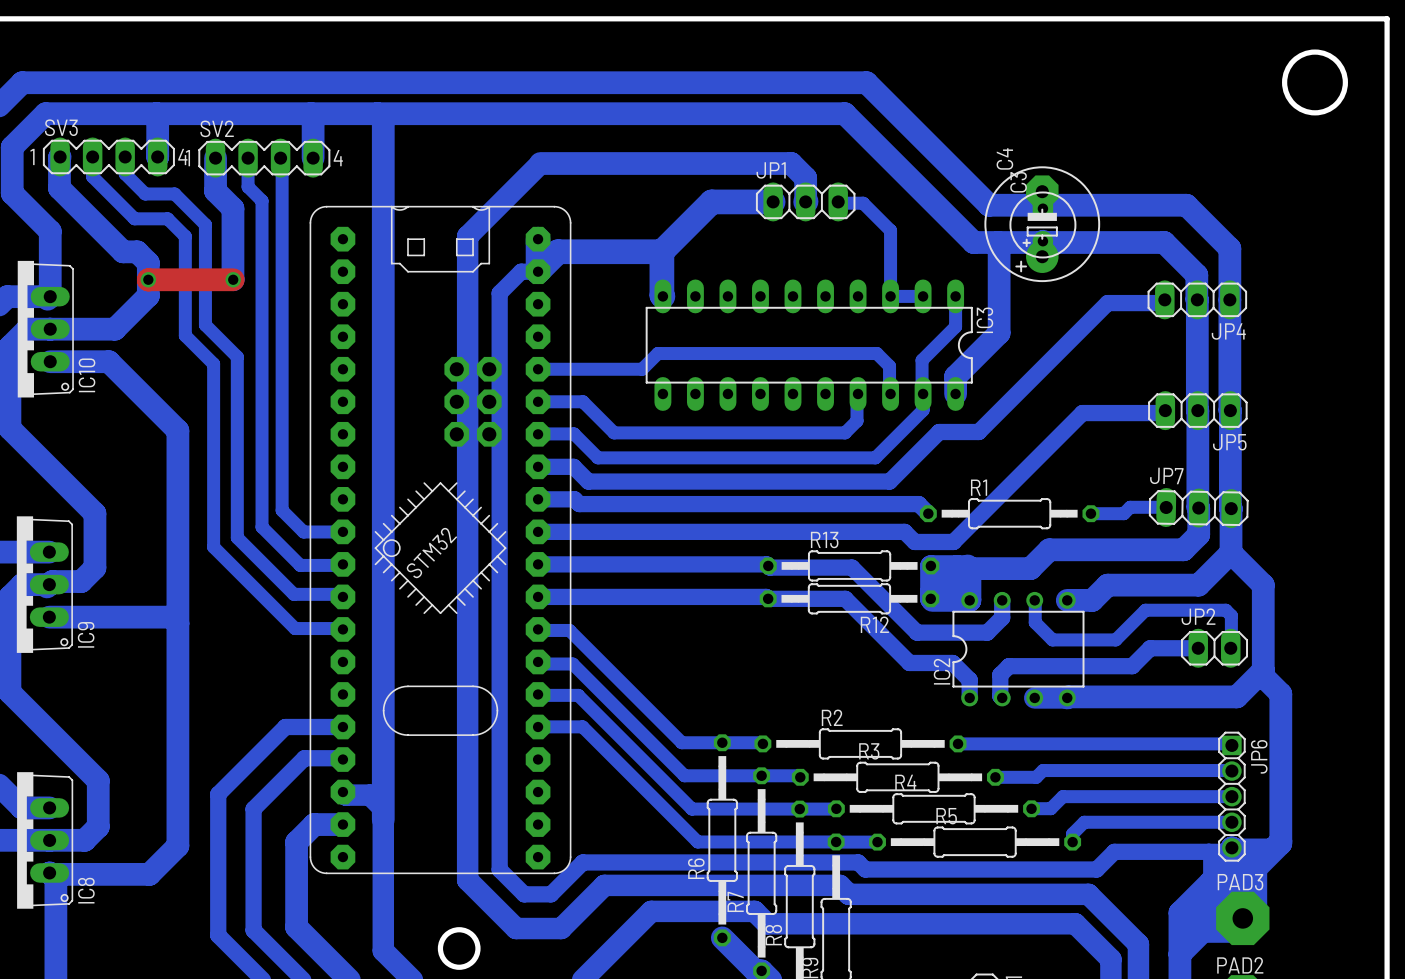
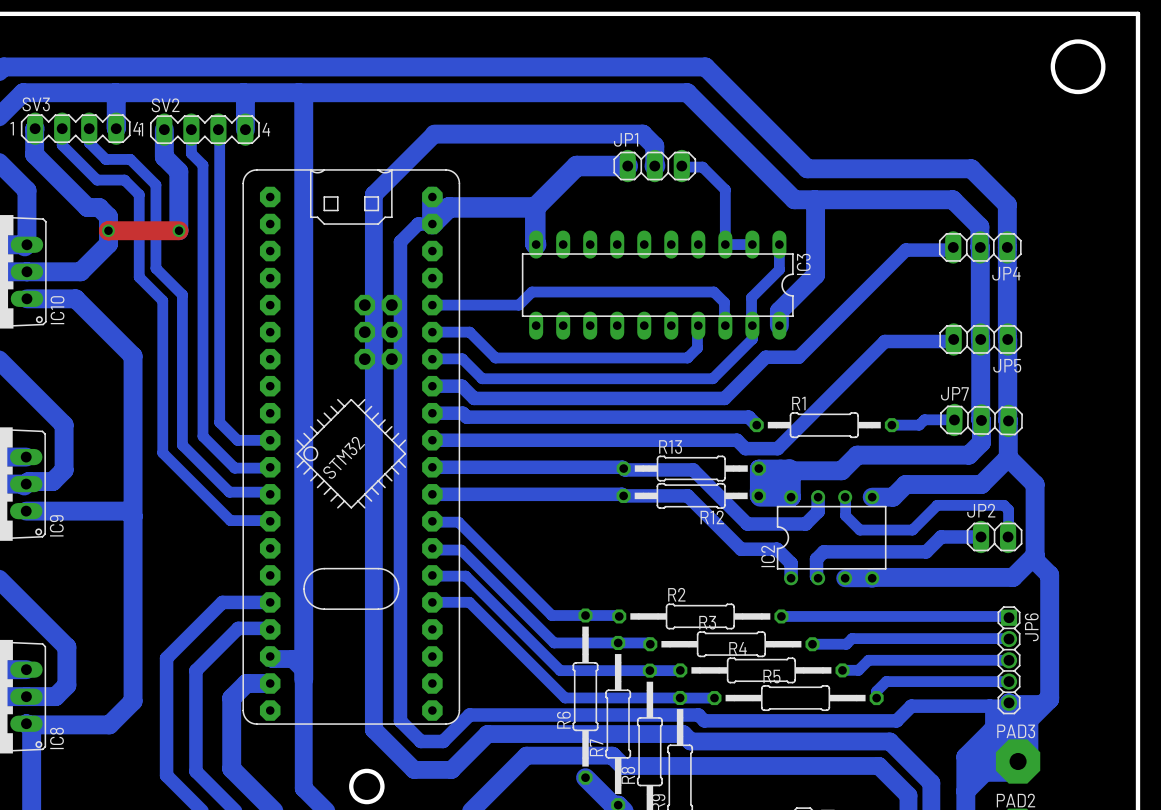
C3: (1042, 224) -> none
C4: (1042, 224) -> none

